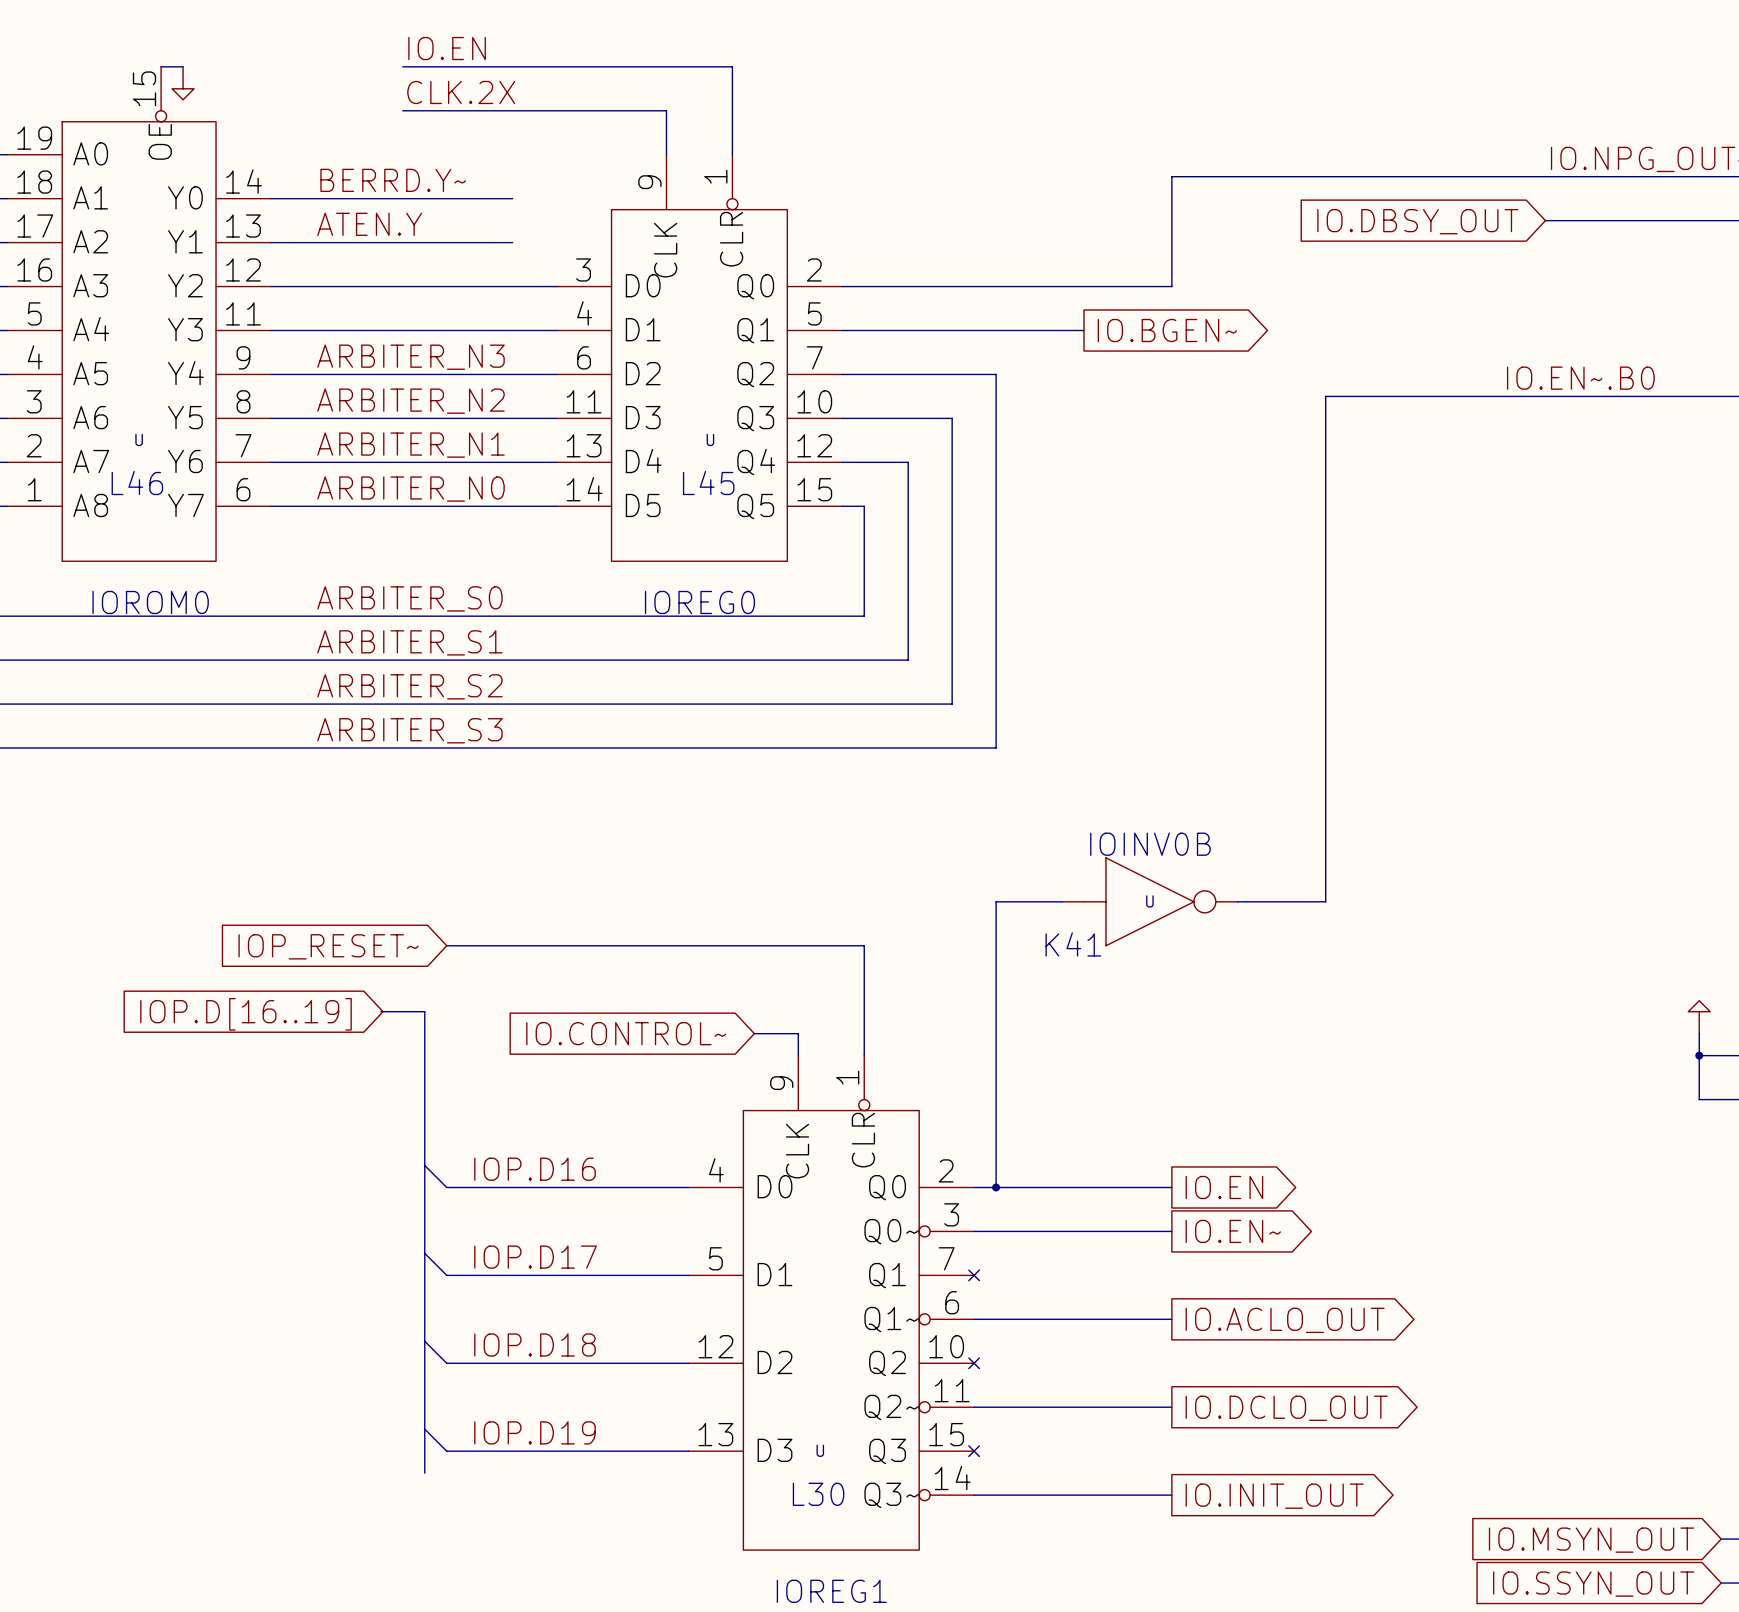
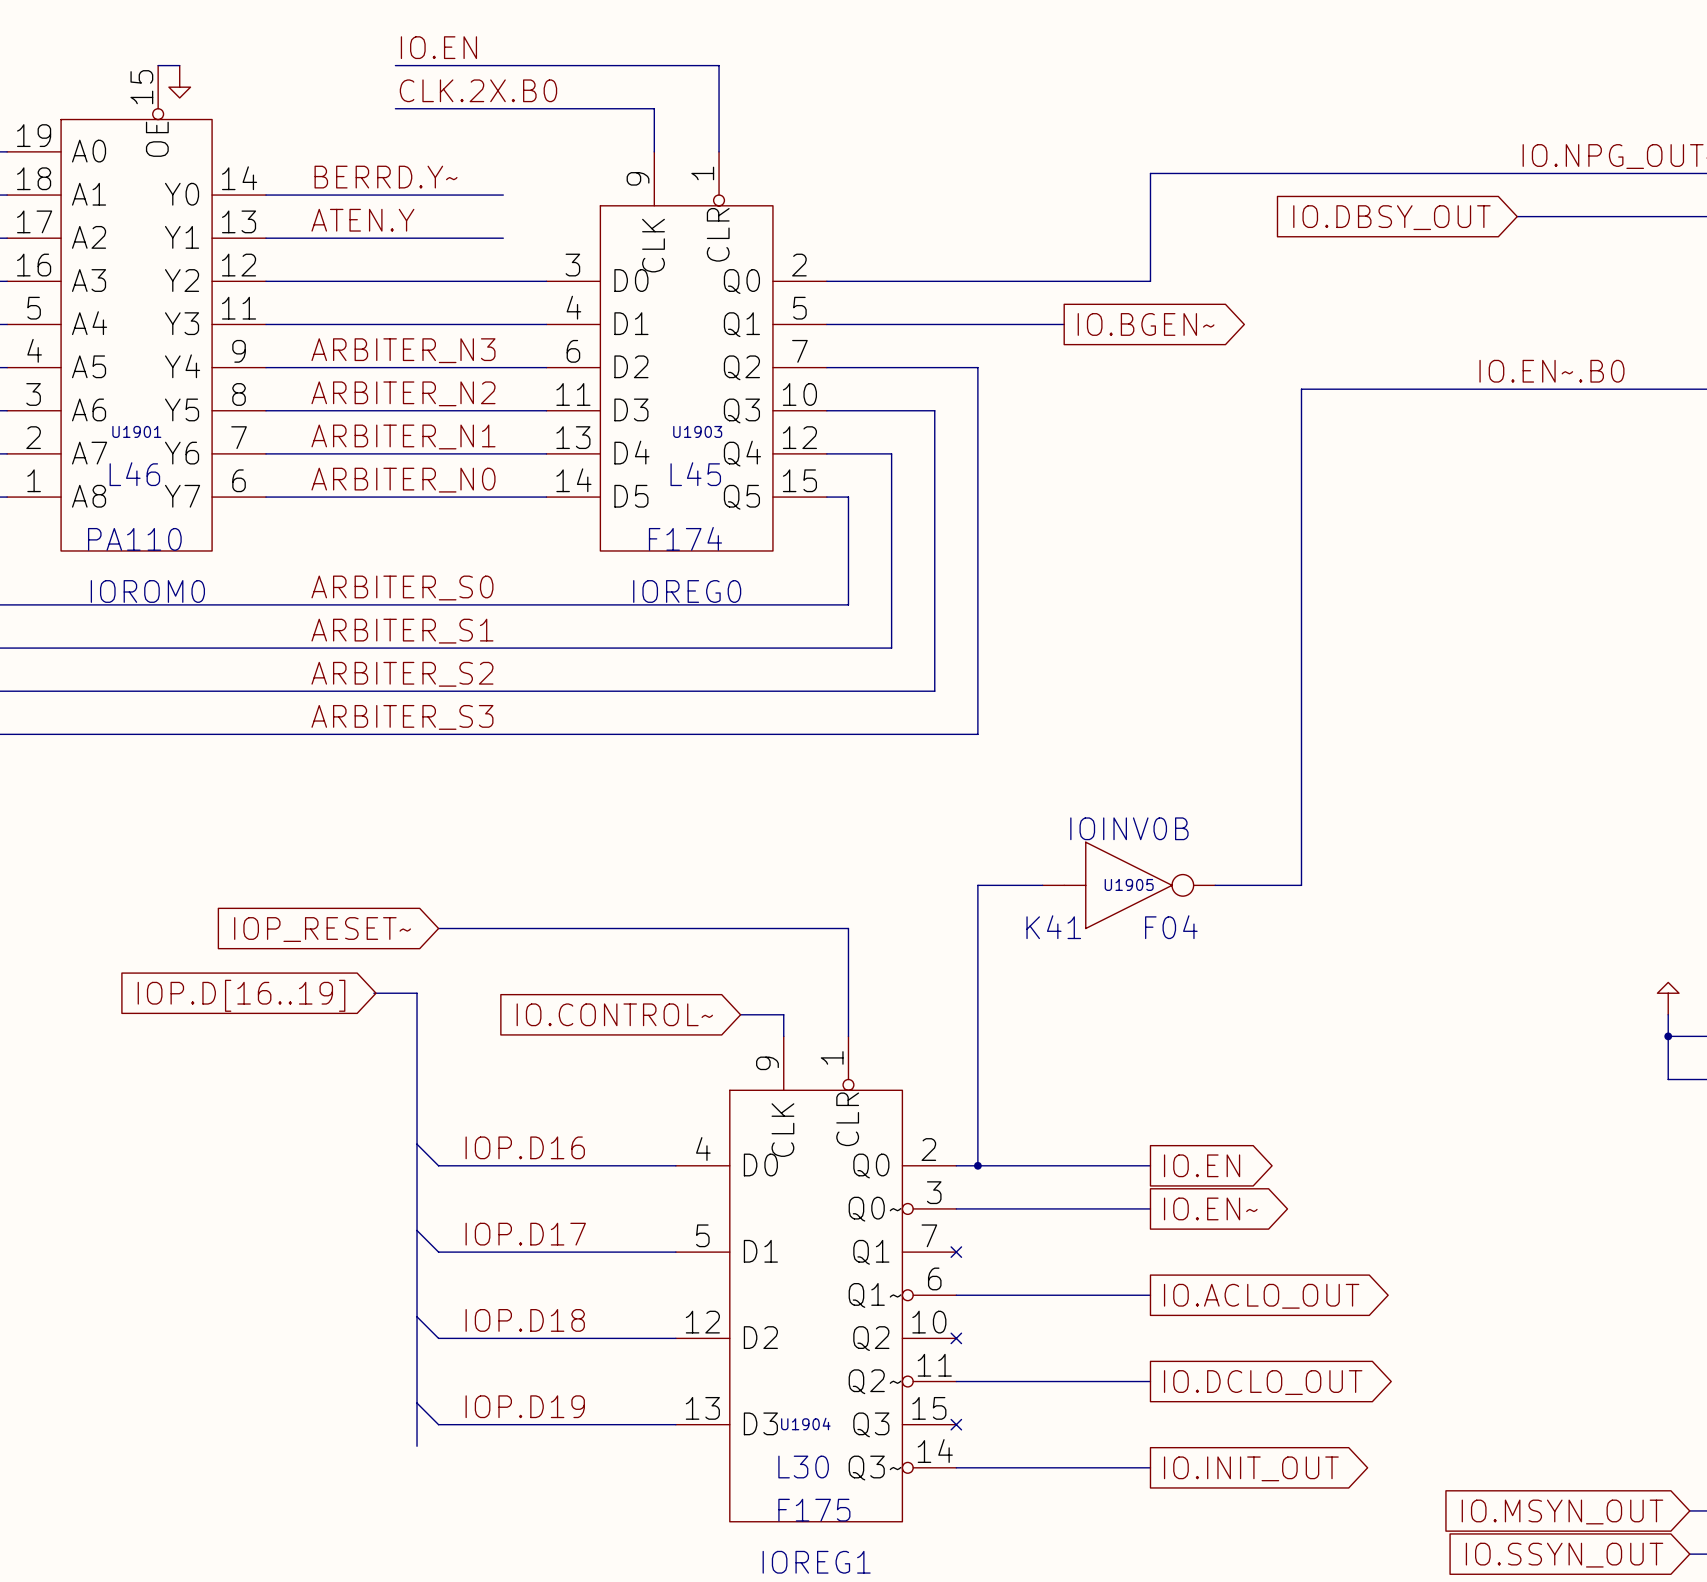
label: CLK.2X (461, 92) -> CLK.2X.B0 (478, 90)
U name: U (139, 439) -> U1901 (136, 431)
U name: U (710, 439) -> U1903 (697, 431)
U value: none -> F174 (685, 538)
U value: none -> PA110 (134, 539)
U name: U (1149, 901) -> U1905 (1129, 884)
U value: none -> F04 (1171, 927)
U name: U (820, 1450) -> U1904 (805, 1424)
U value: none -> F175 (814, 1510)

